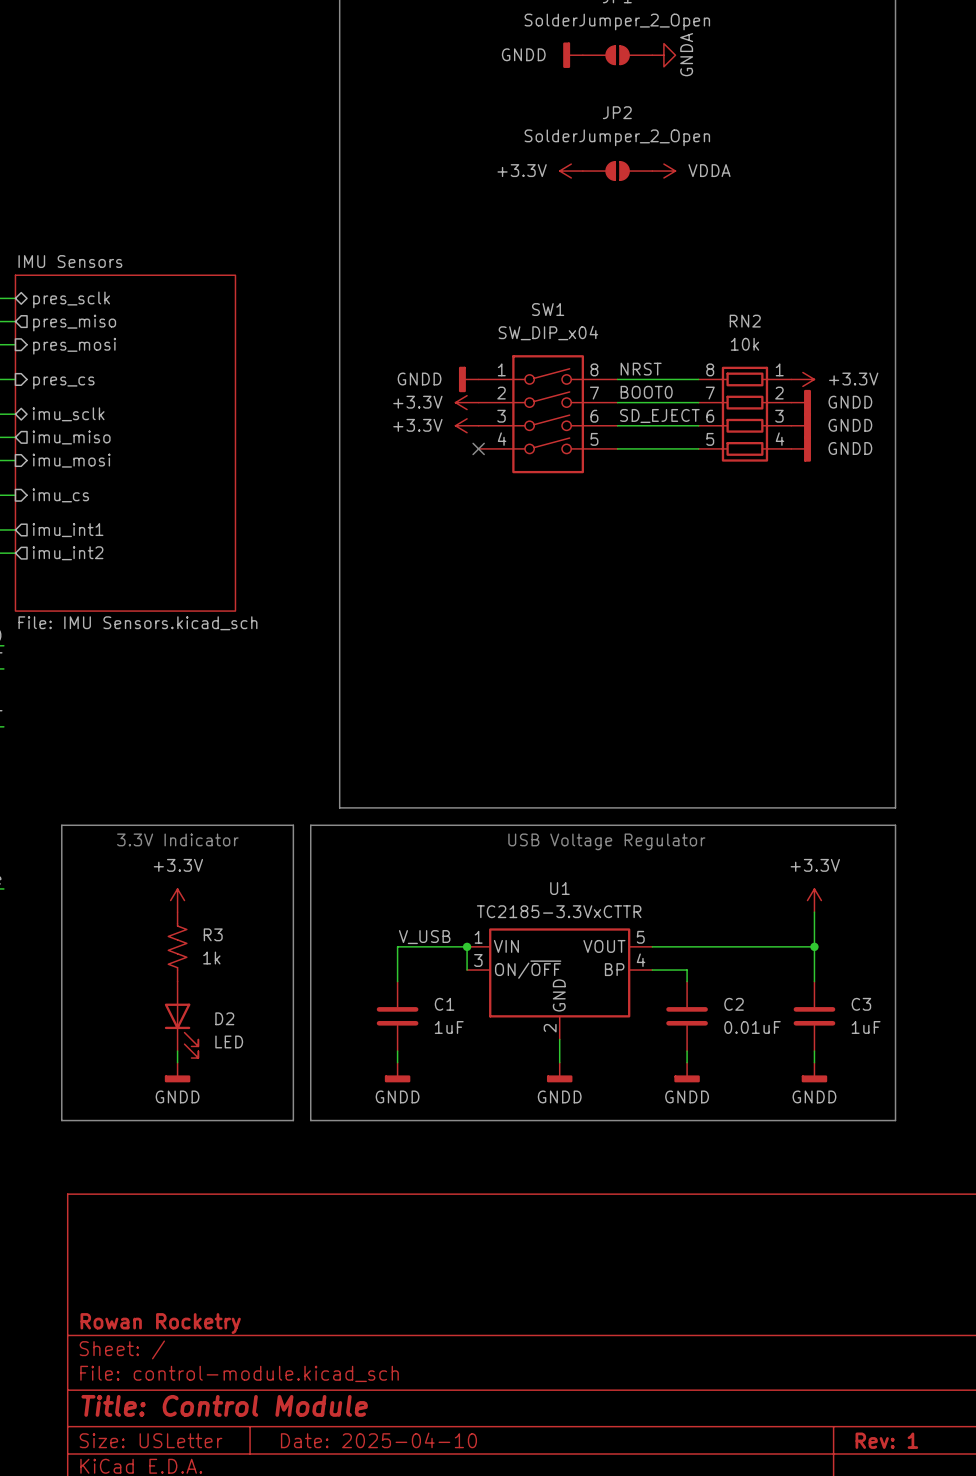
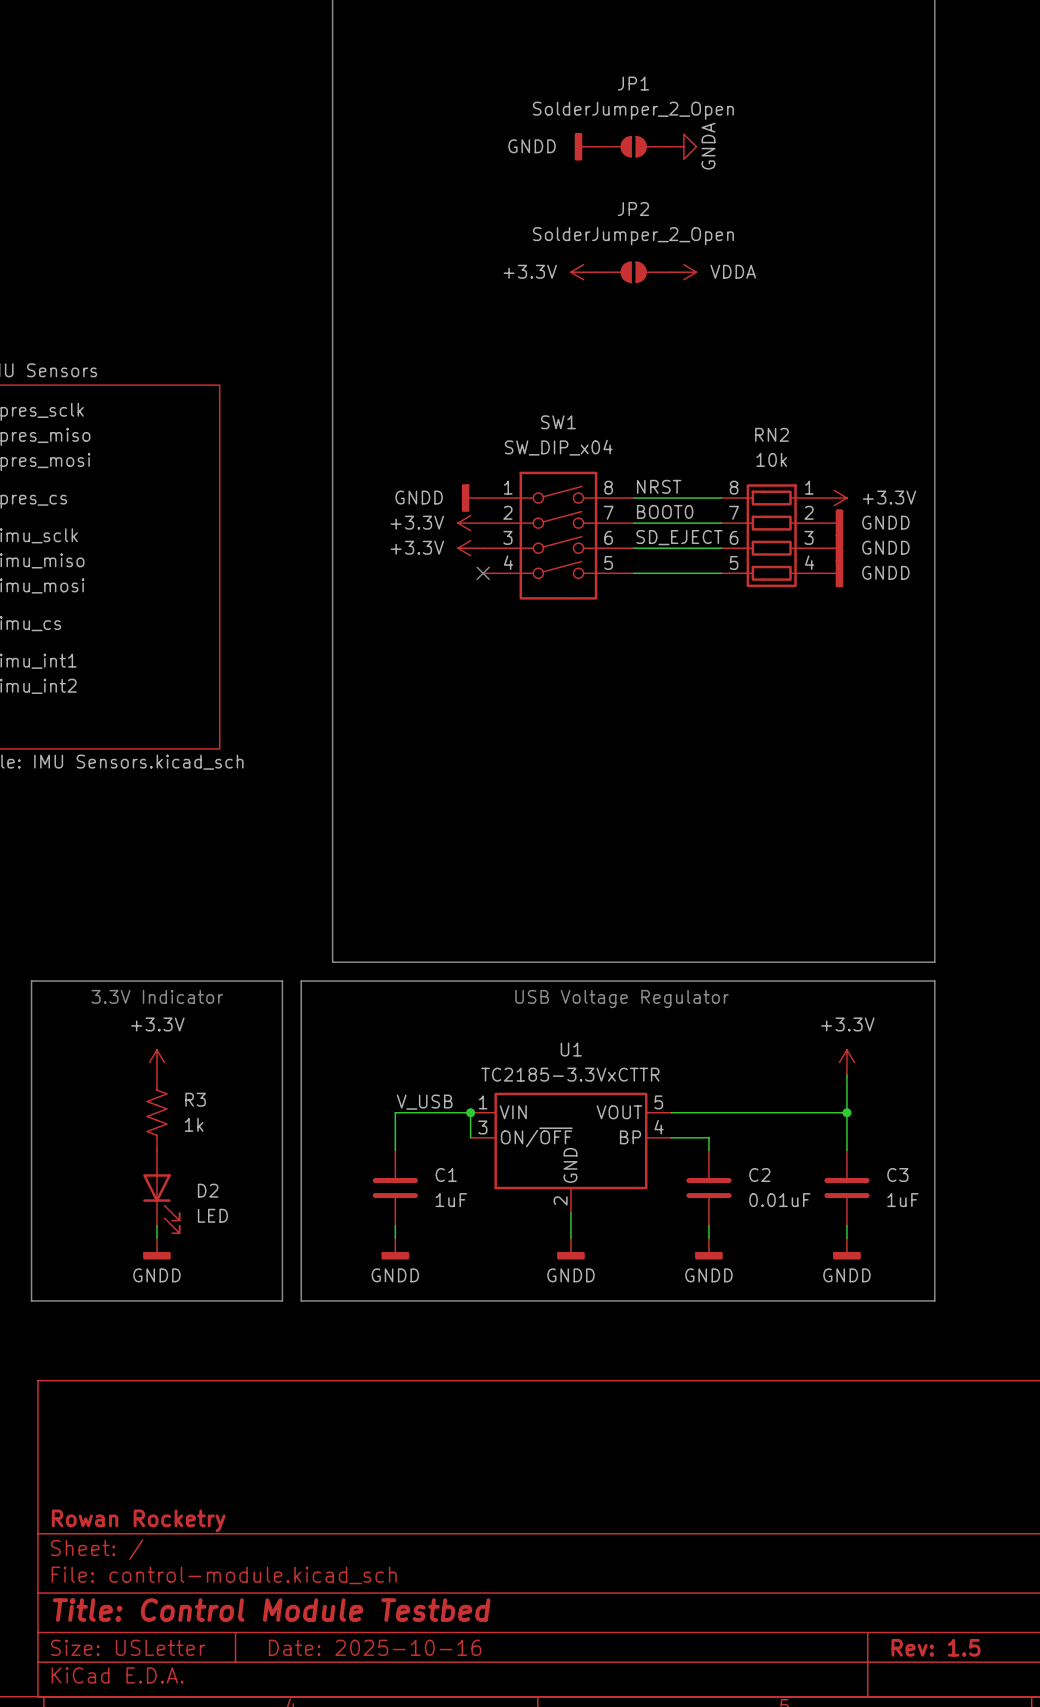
title block: Title: Control Module (224, 1405) -> Title: Control Module Testbed (271, 1610)
title block: Date: 2025-04-10 (378, 1440) -> Date: 2025-10-16 (375, 1647)
title block: Rev: 1 (886, 1440) -> Rev: 1.5 (935, 1647)

